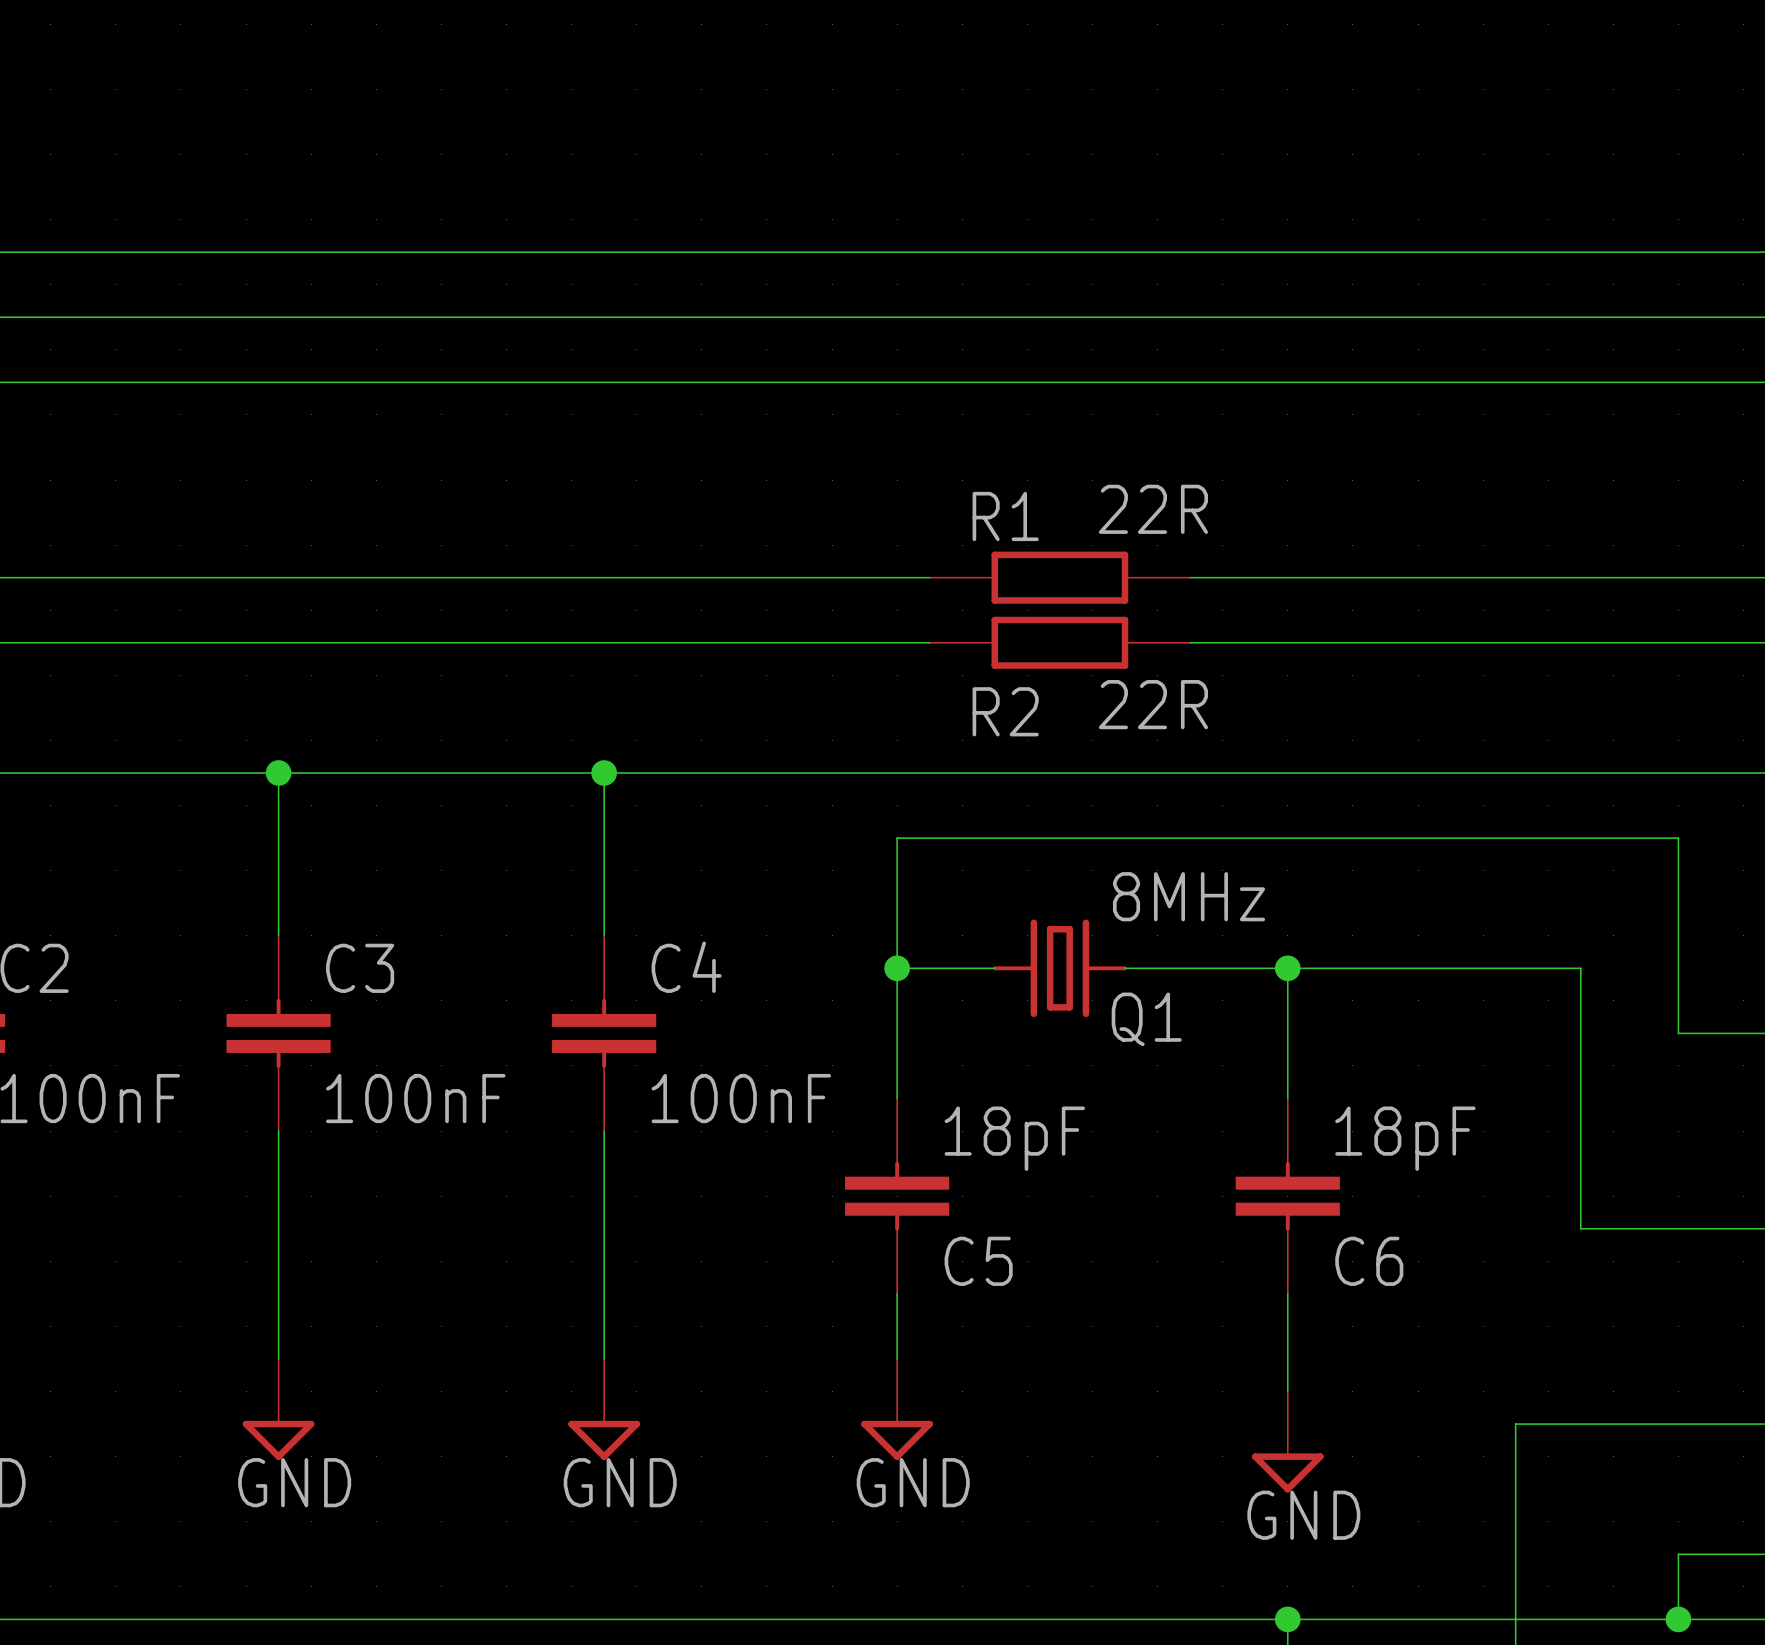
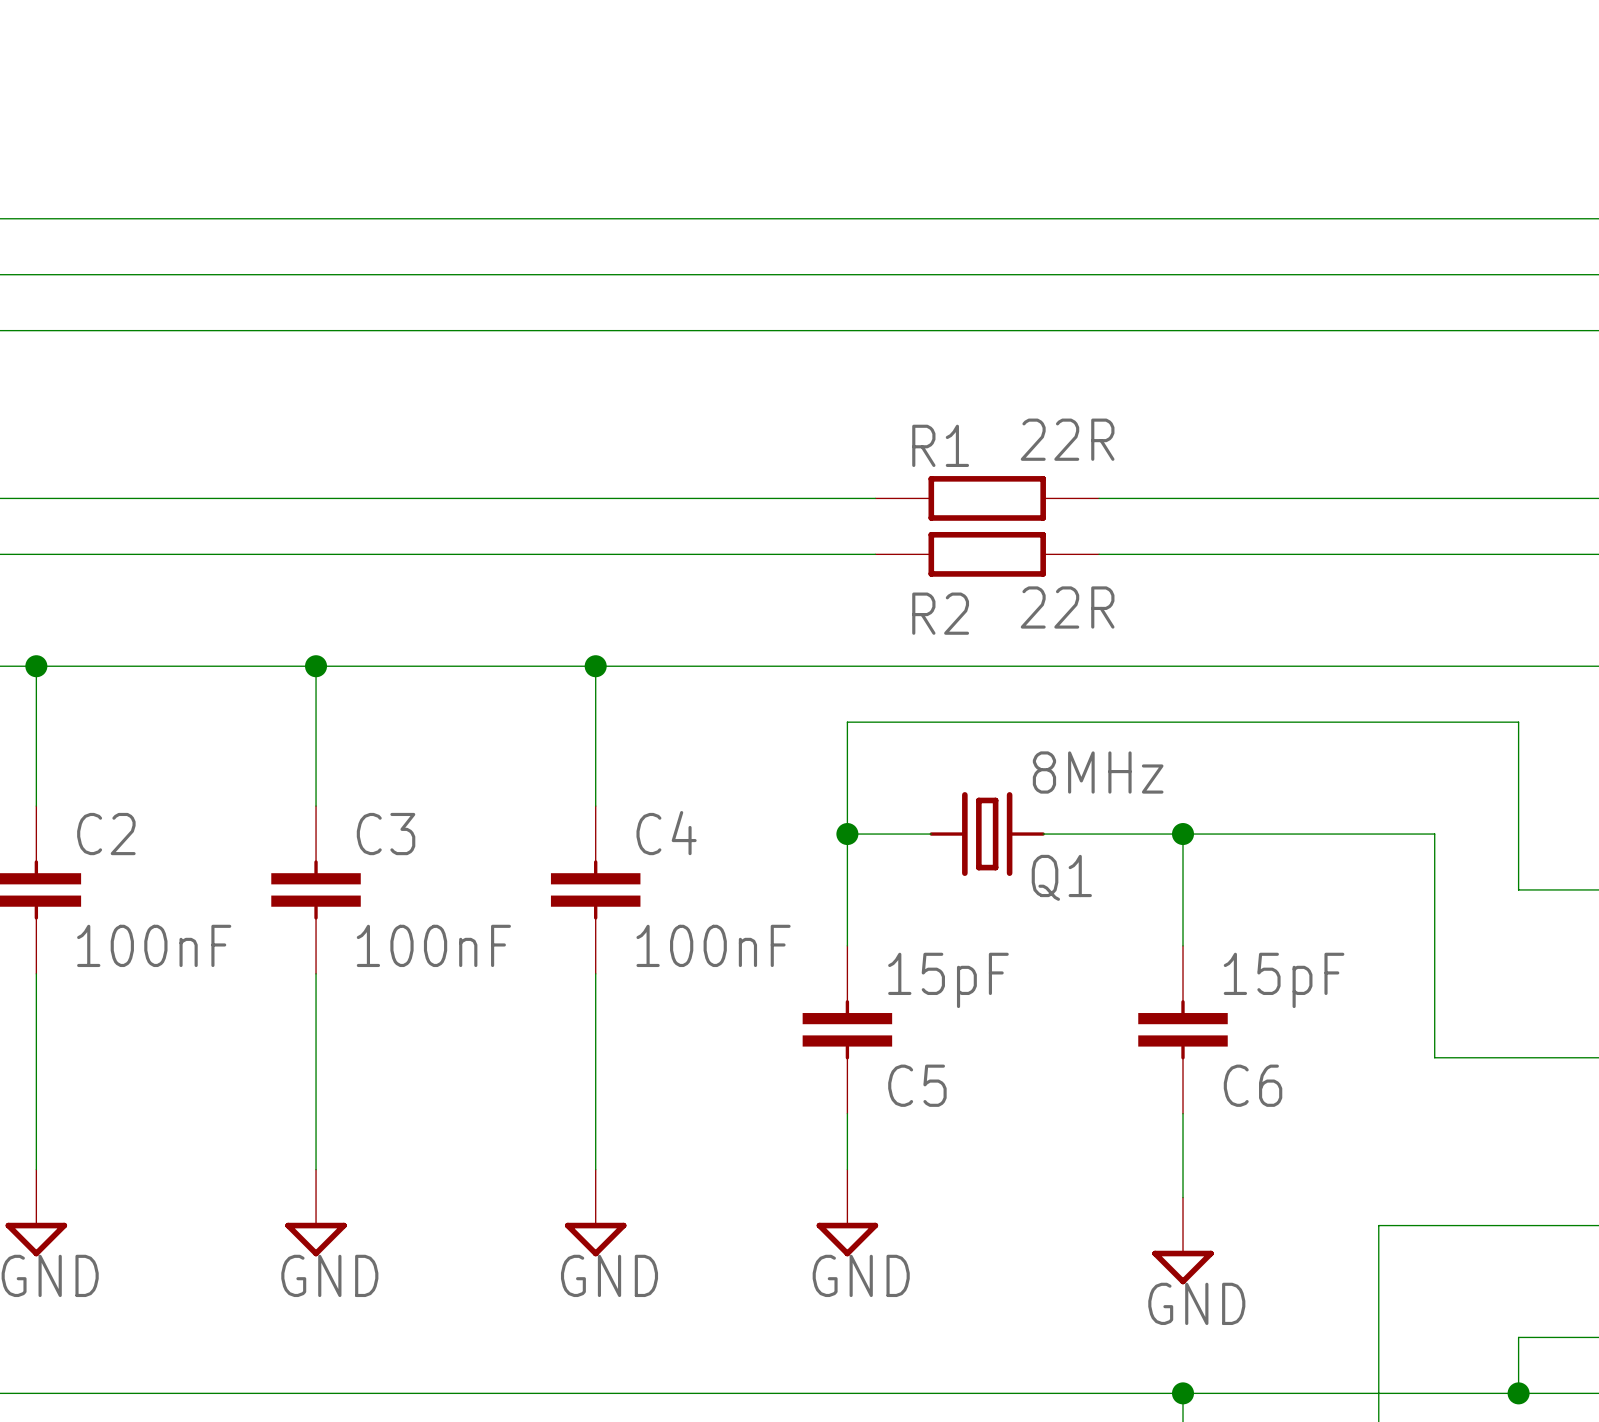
C5 value: 18pF (1014, 1138) -> 15pF (948, 980)
C6 value: 18pF (1405, 1138) -> 15pF (1284, 980)

